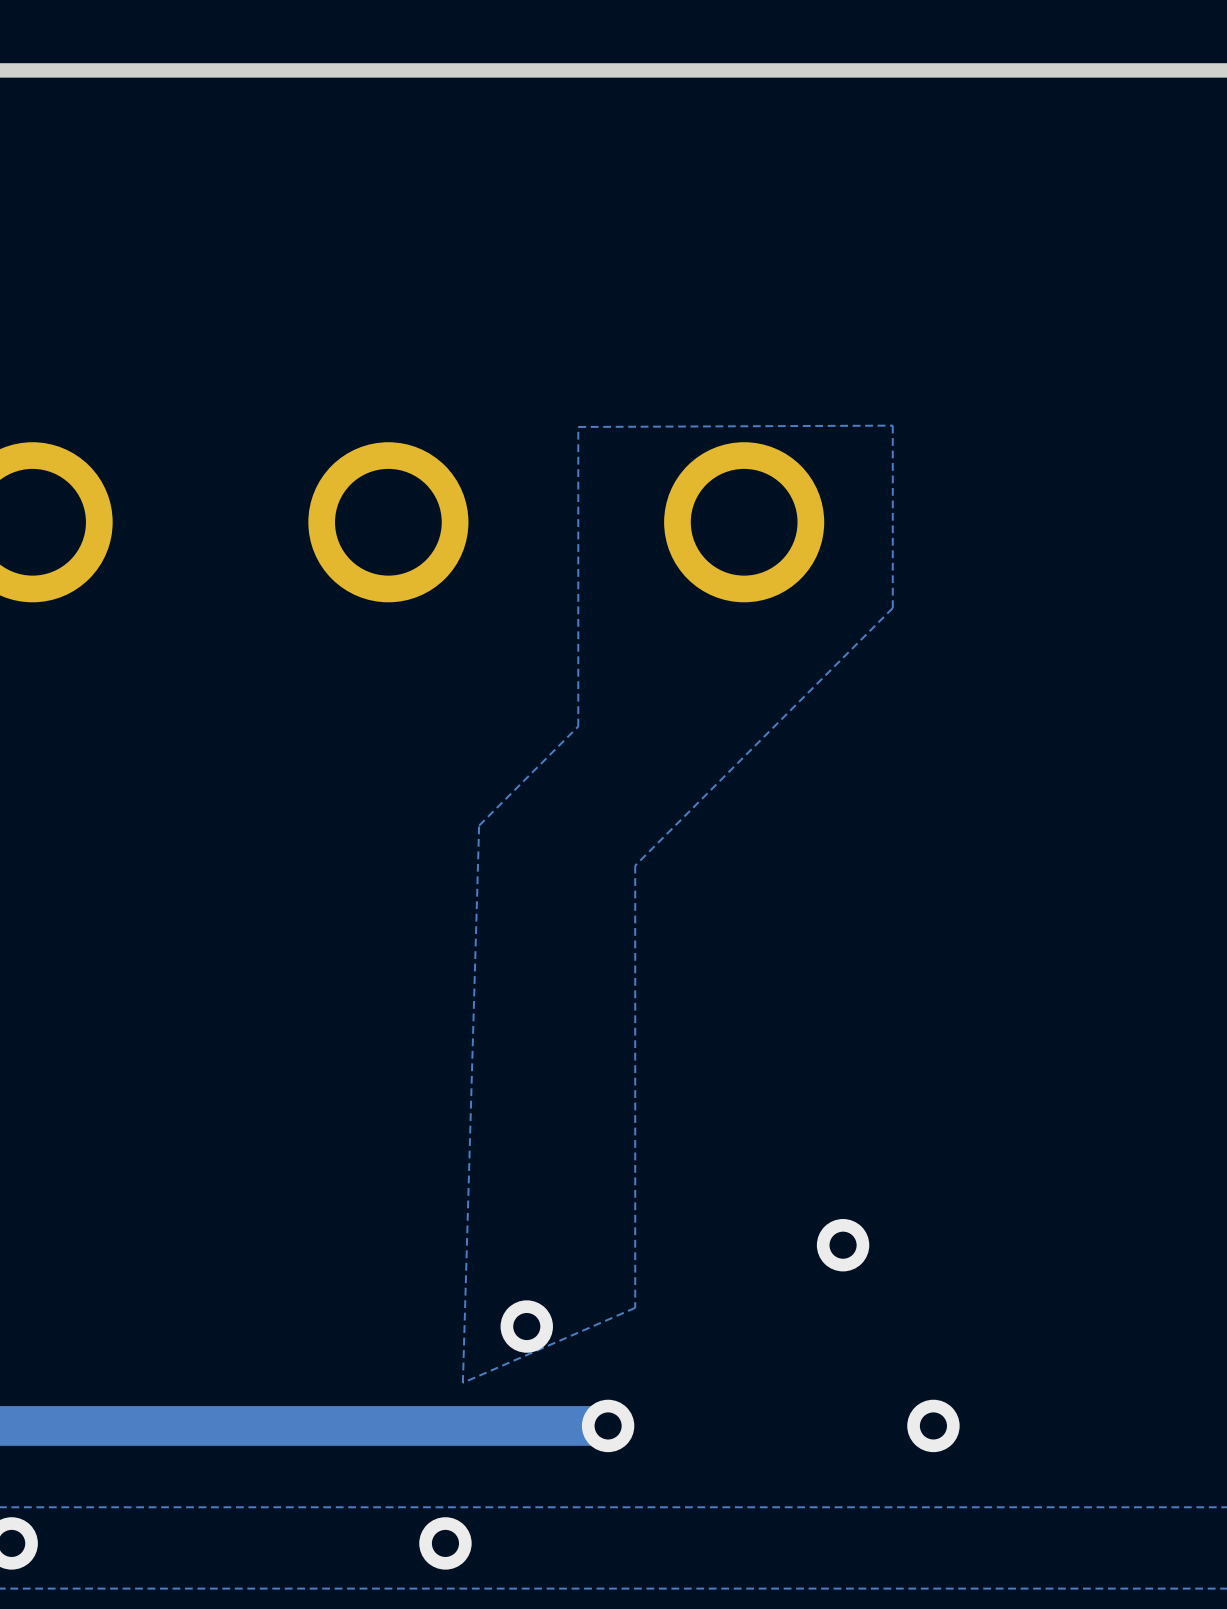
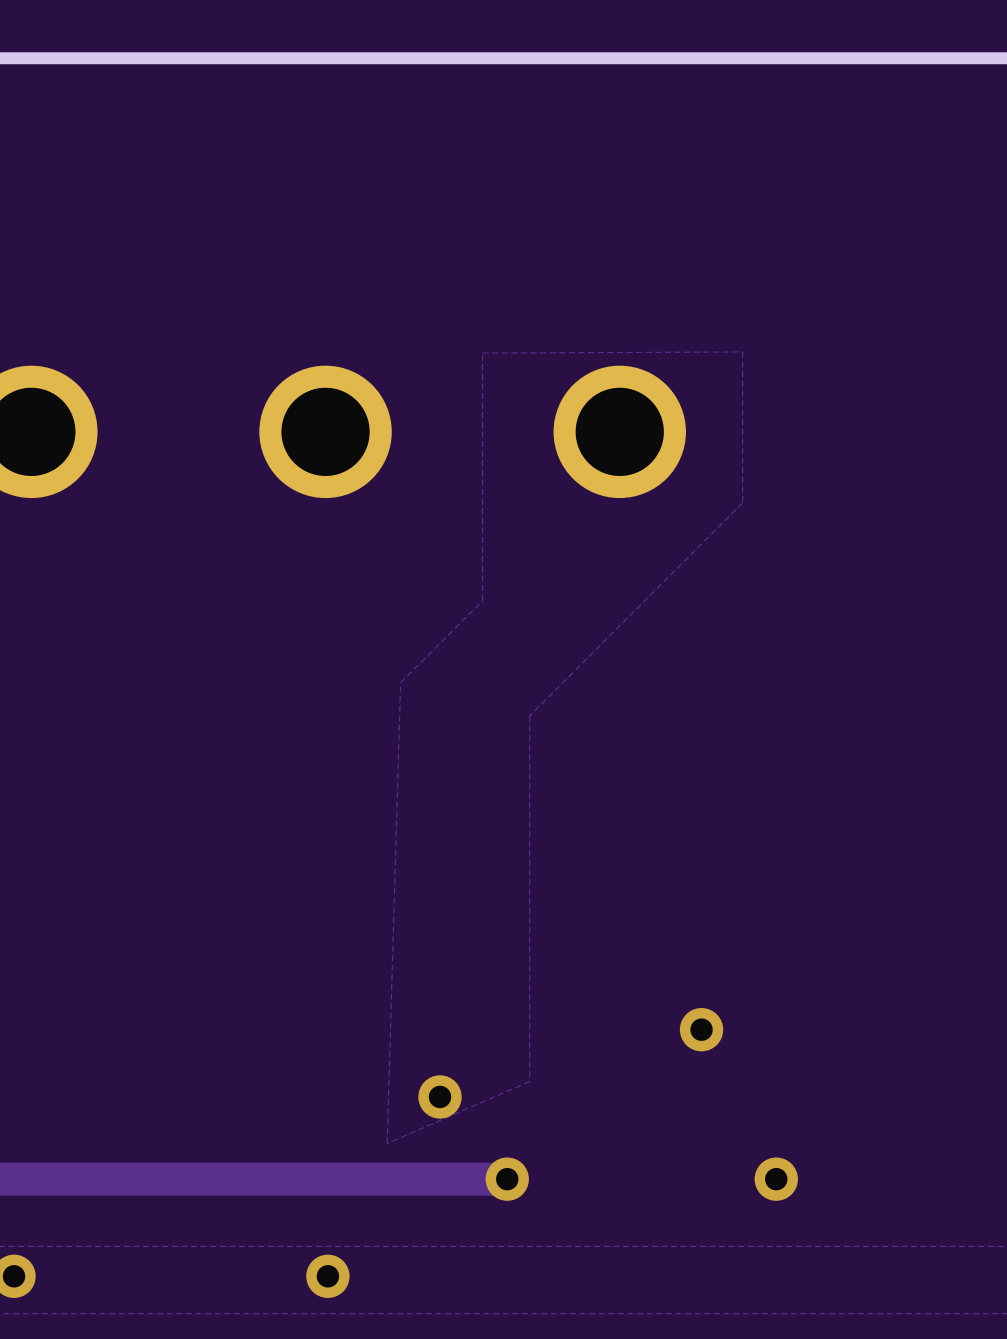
via position: (445, 1543) -> (327, 1276)

